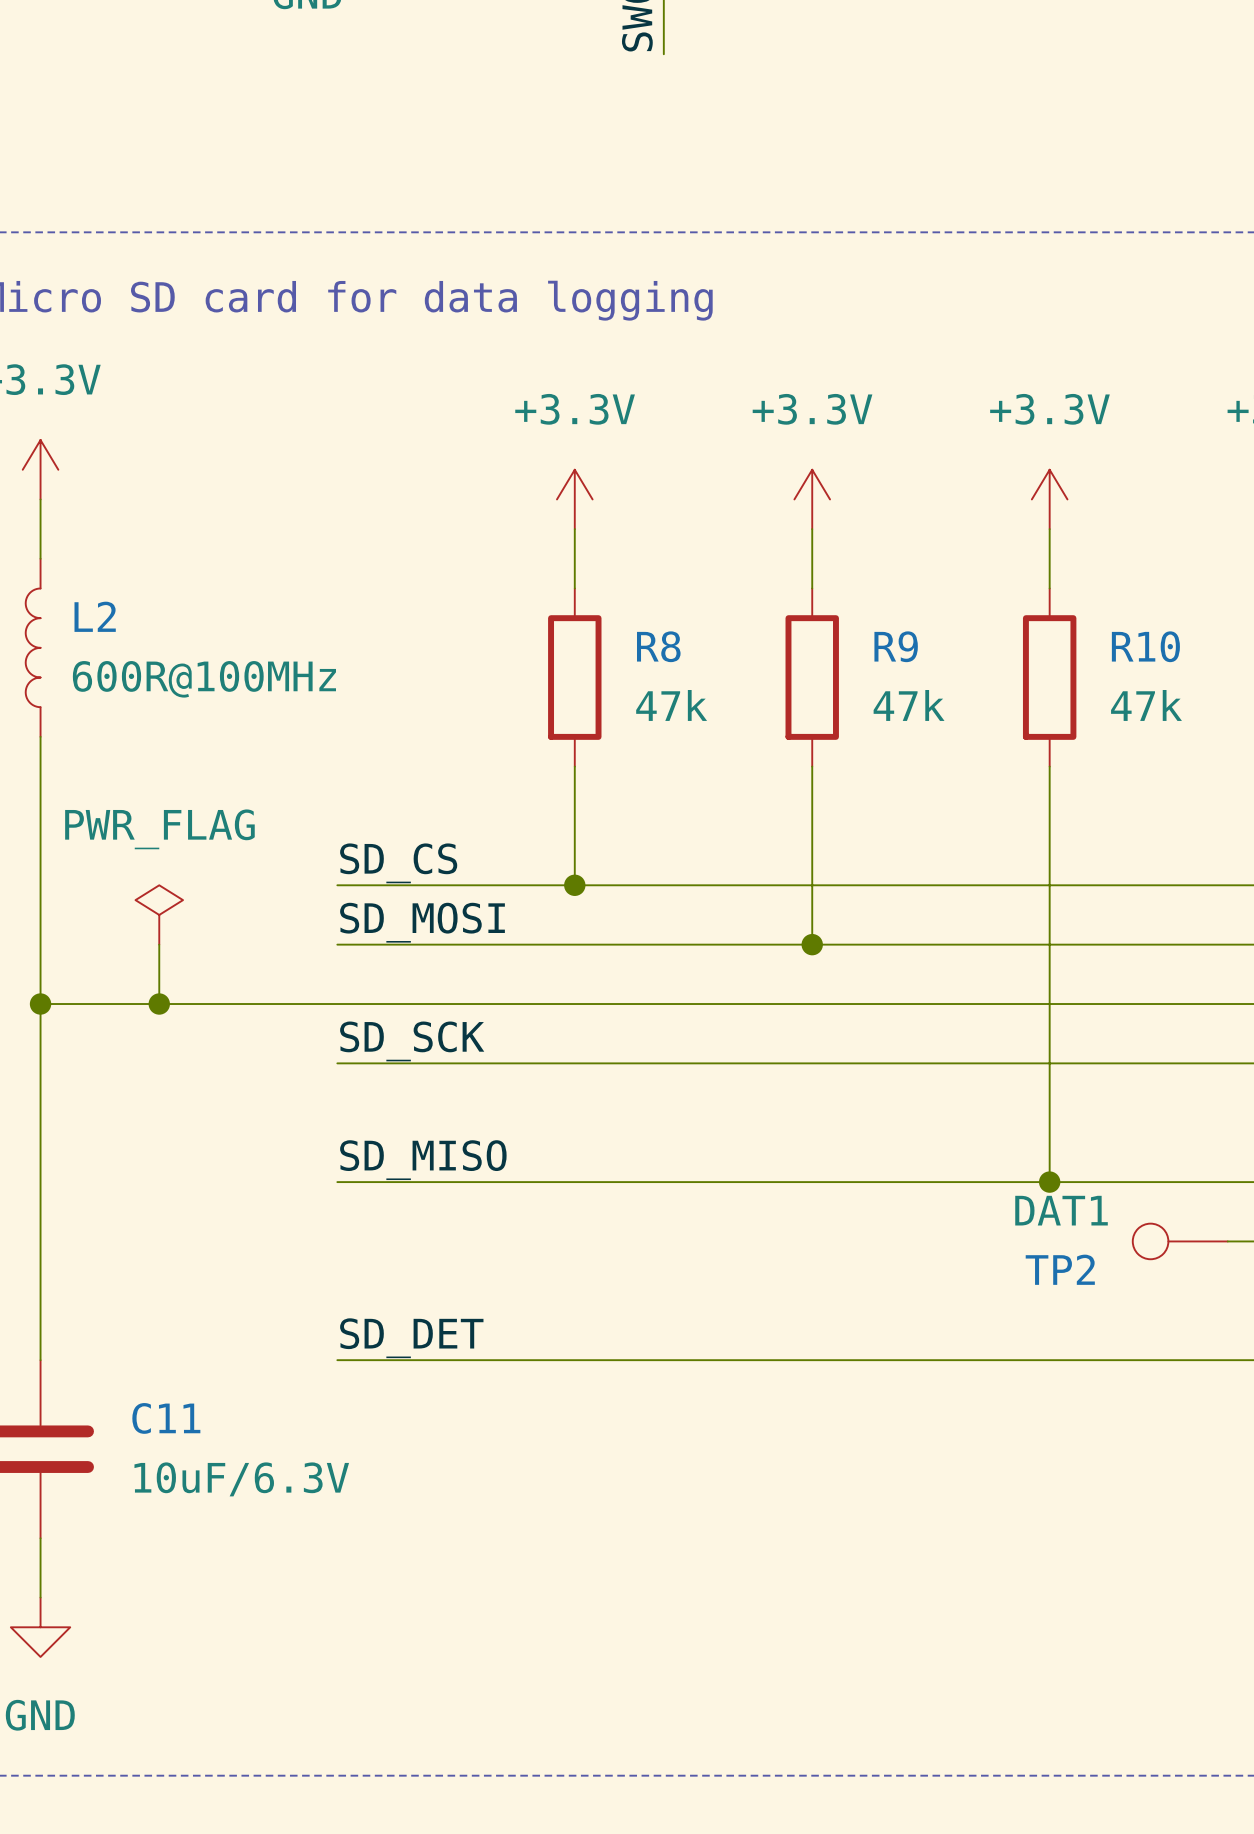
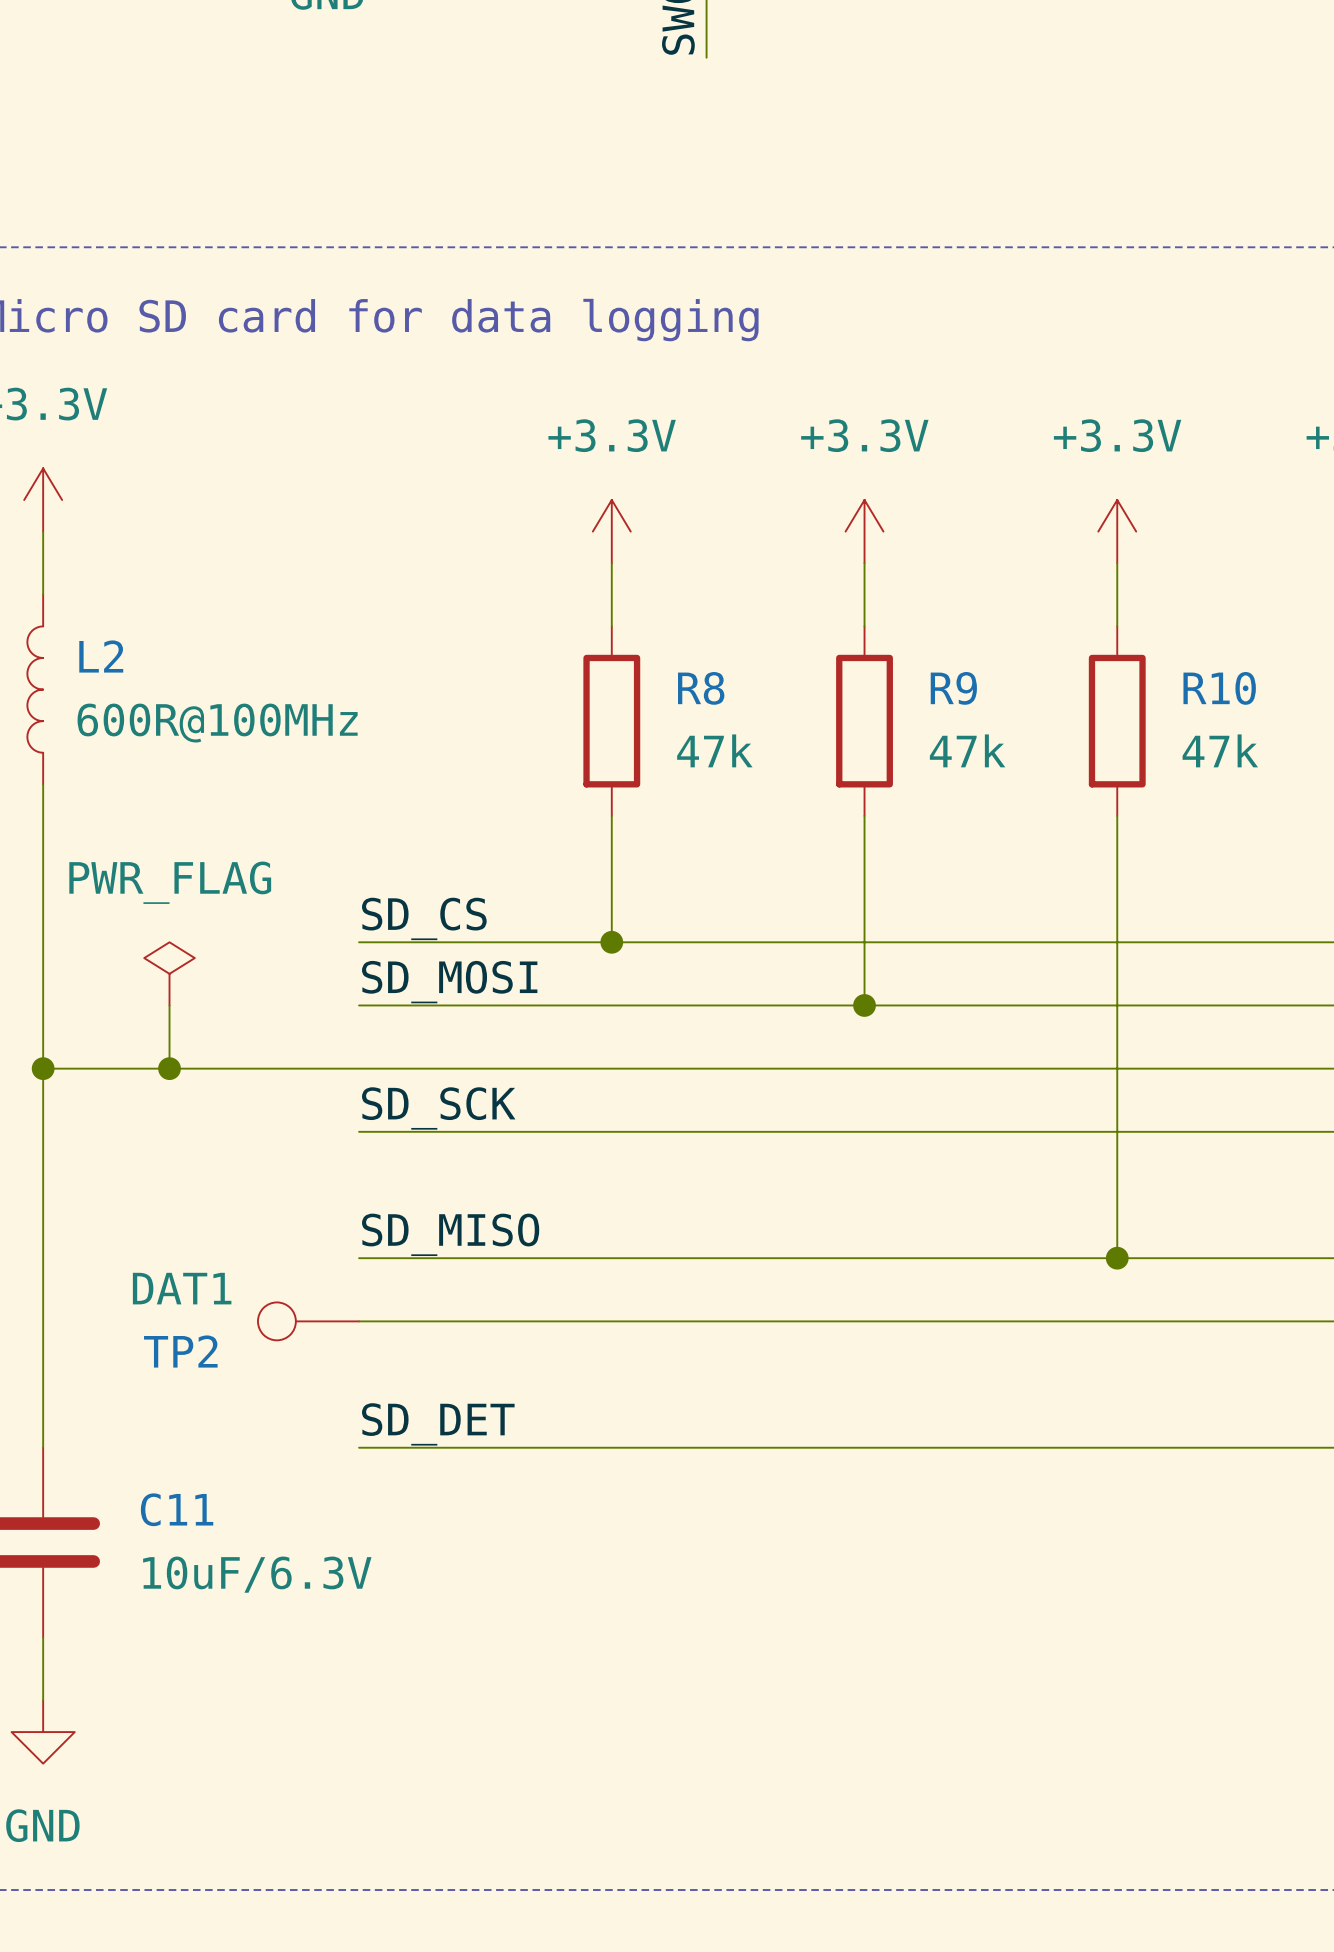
wire: none -> (359, 1321) (1306, 1321)
TP2 position: (1180, 1241) -> (308, 1321)

